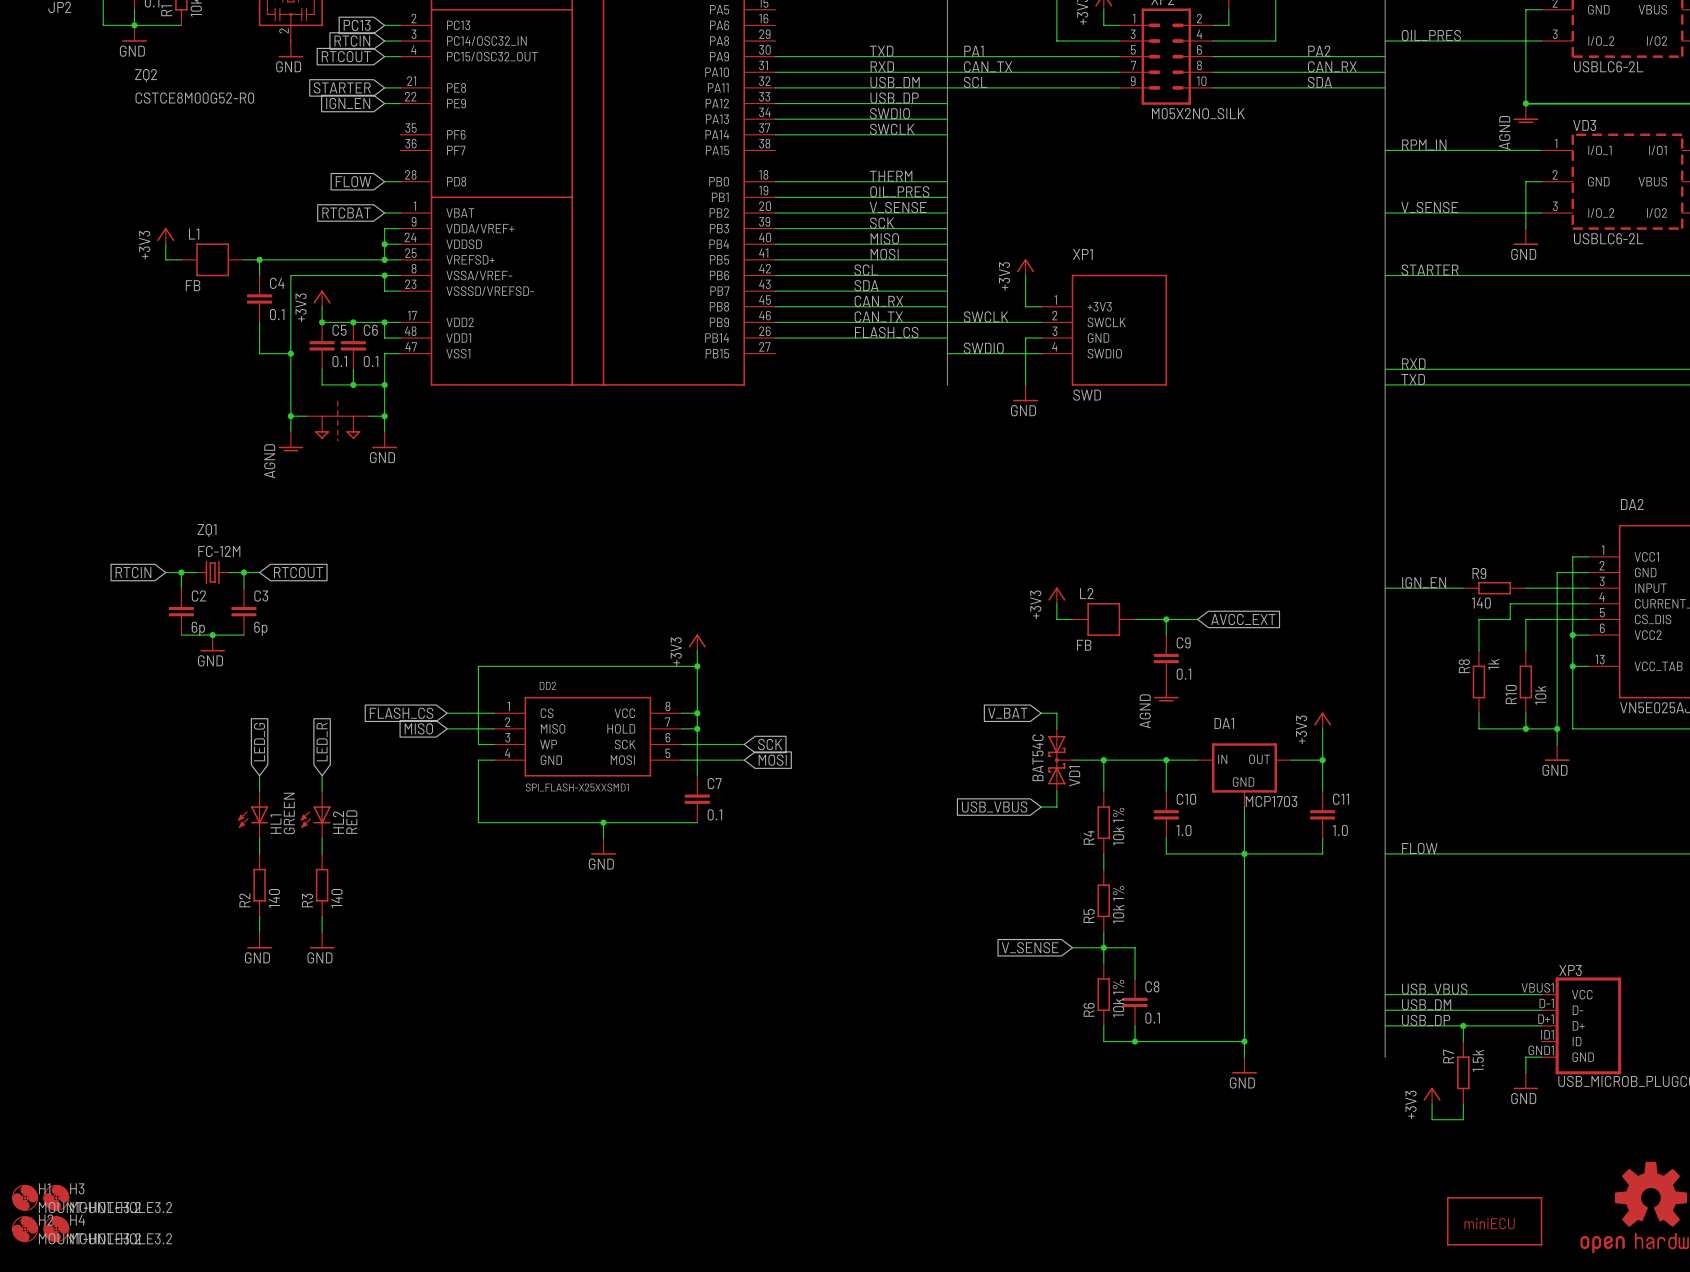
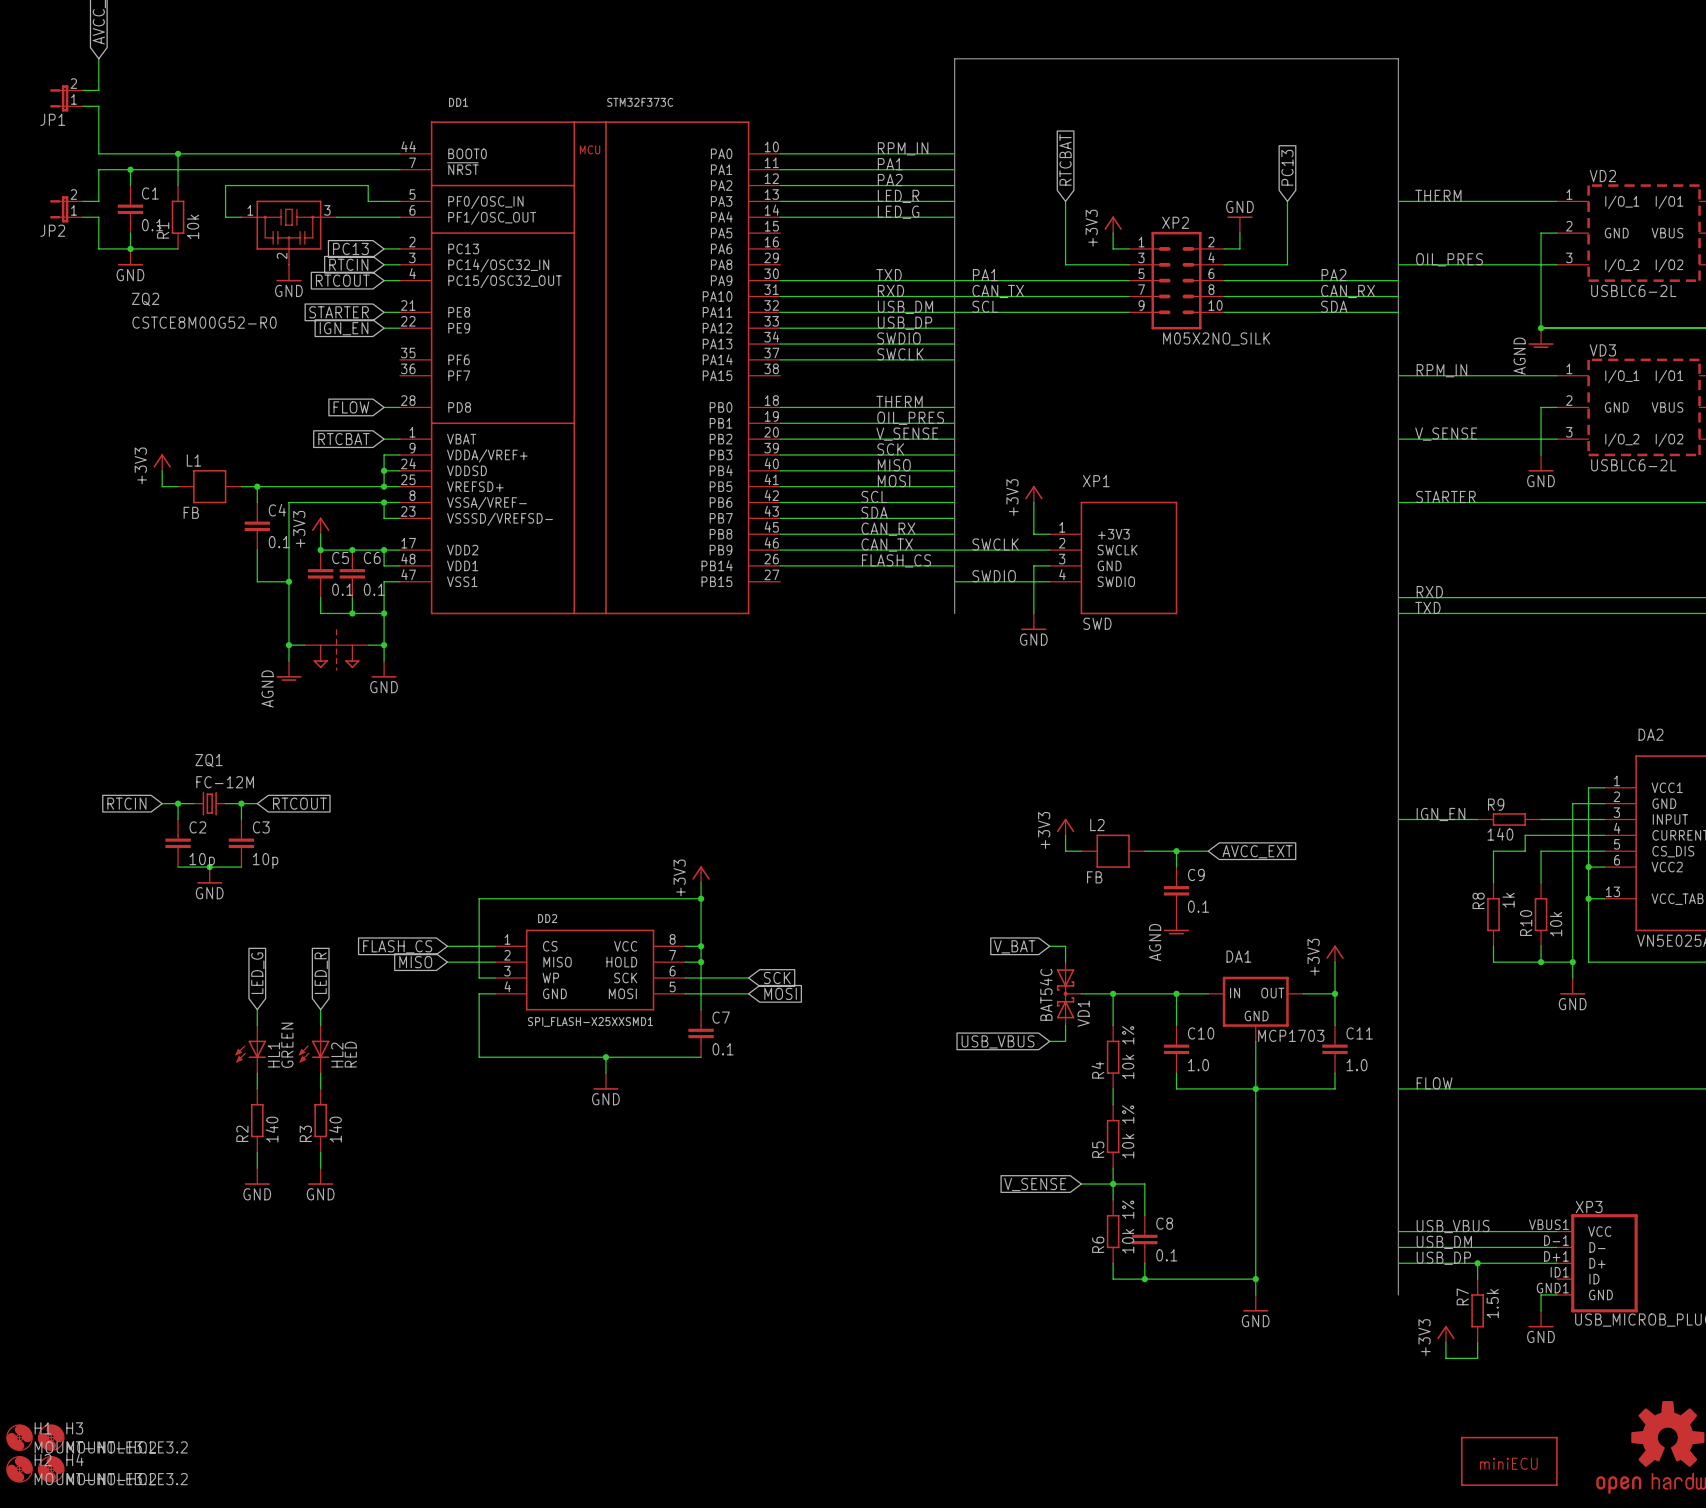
C2 value: 6p (198, 628) -> 10p (202, 860)
C3 value: 6p (260, 628) -> 10p (265, 860)

